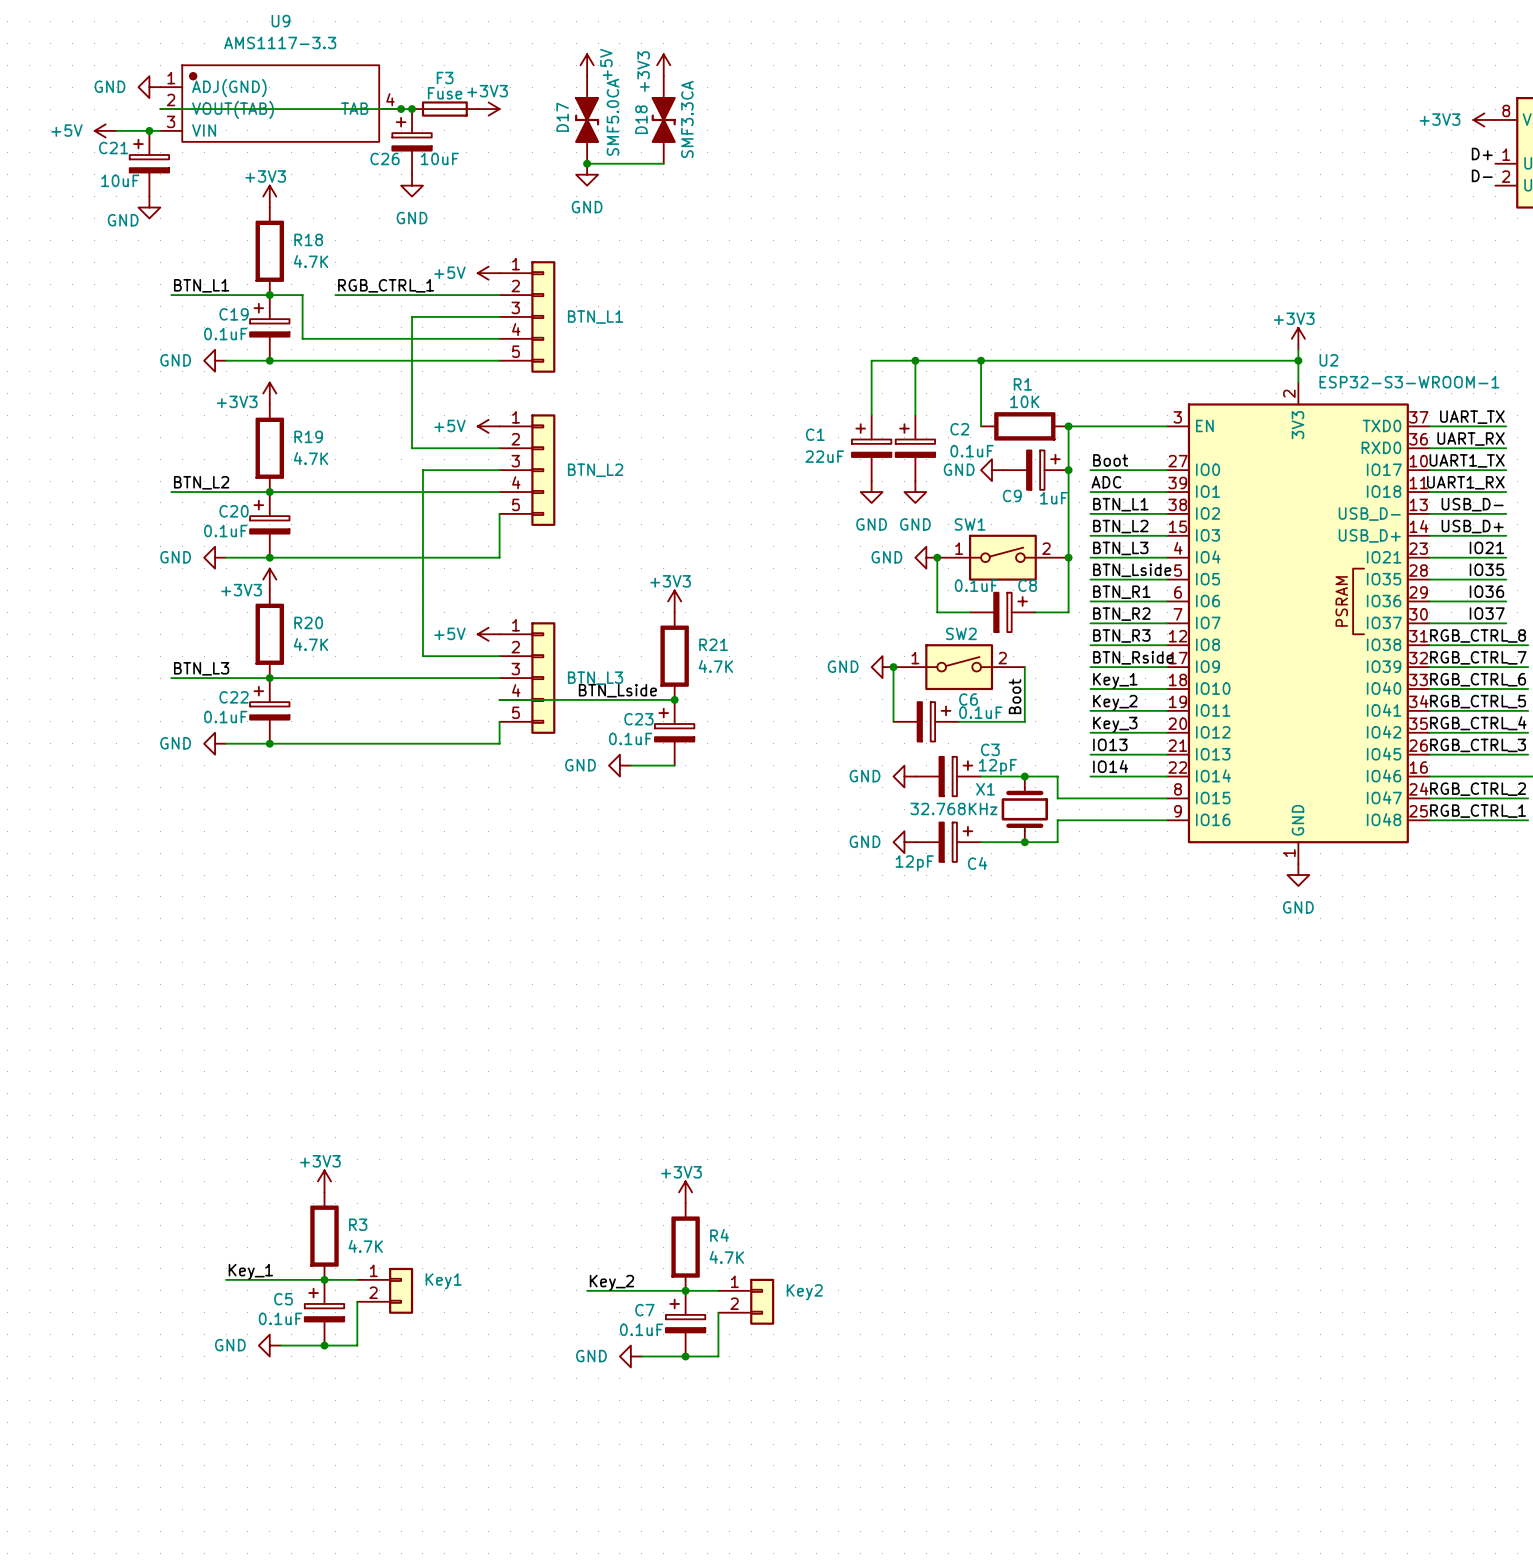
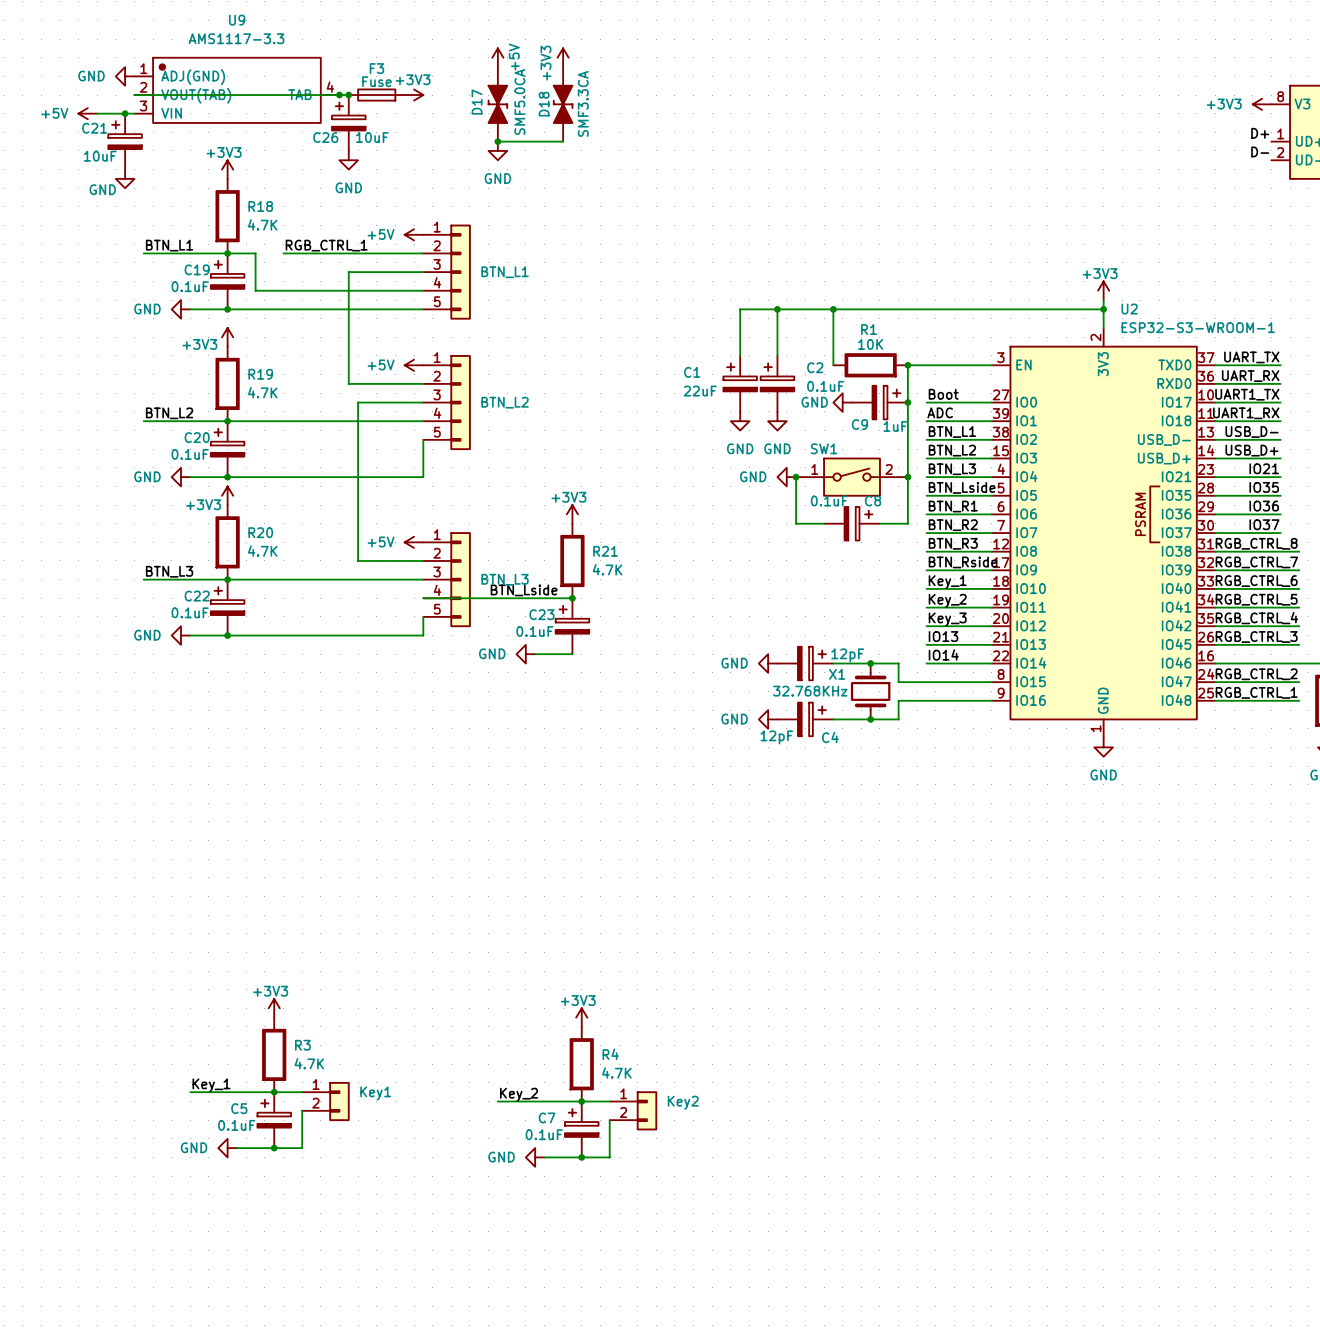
power symbol: GND (882, 667) -> none
wire: (893, 667) (893, 721) -> none
junction: (893, 667) -> none
SW2: (959, 667) -> none
wire: (1024, 667) (1024, 721) (959, 721) -> none
label: Boot (1015, 696) -> none
C6: 0.1uF (926, 721) -> none
C3 name: C3 (990, 749) -> none

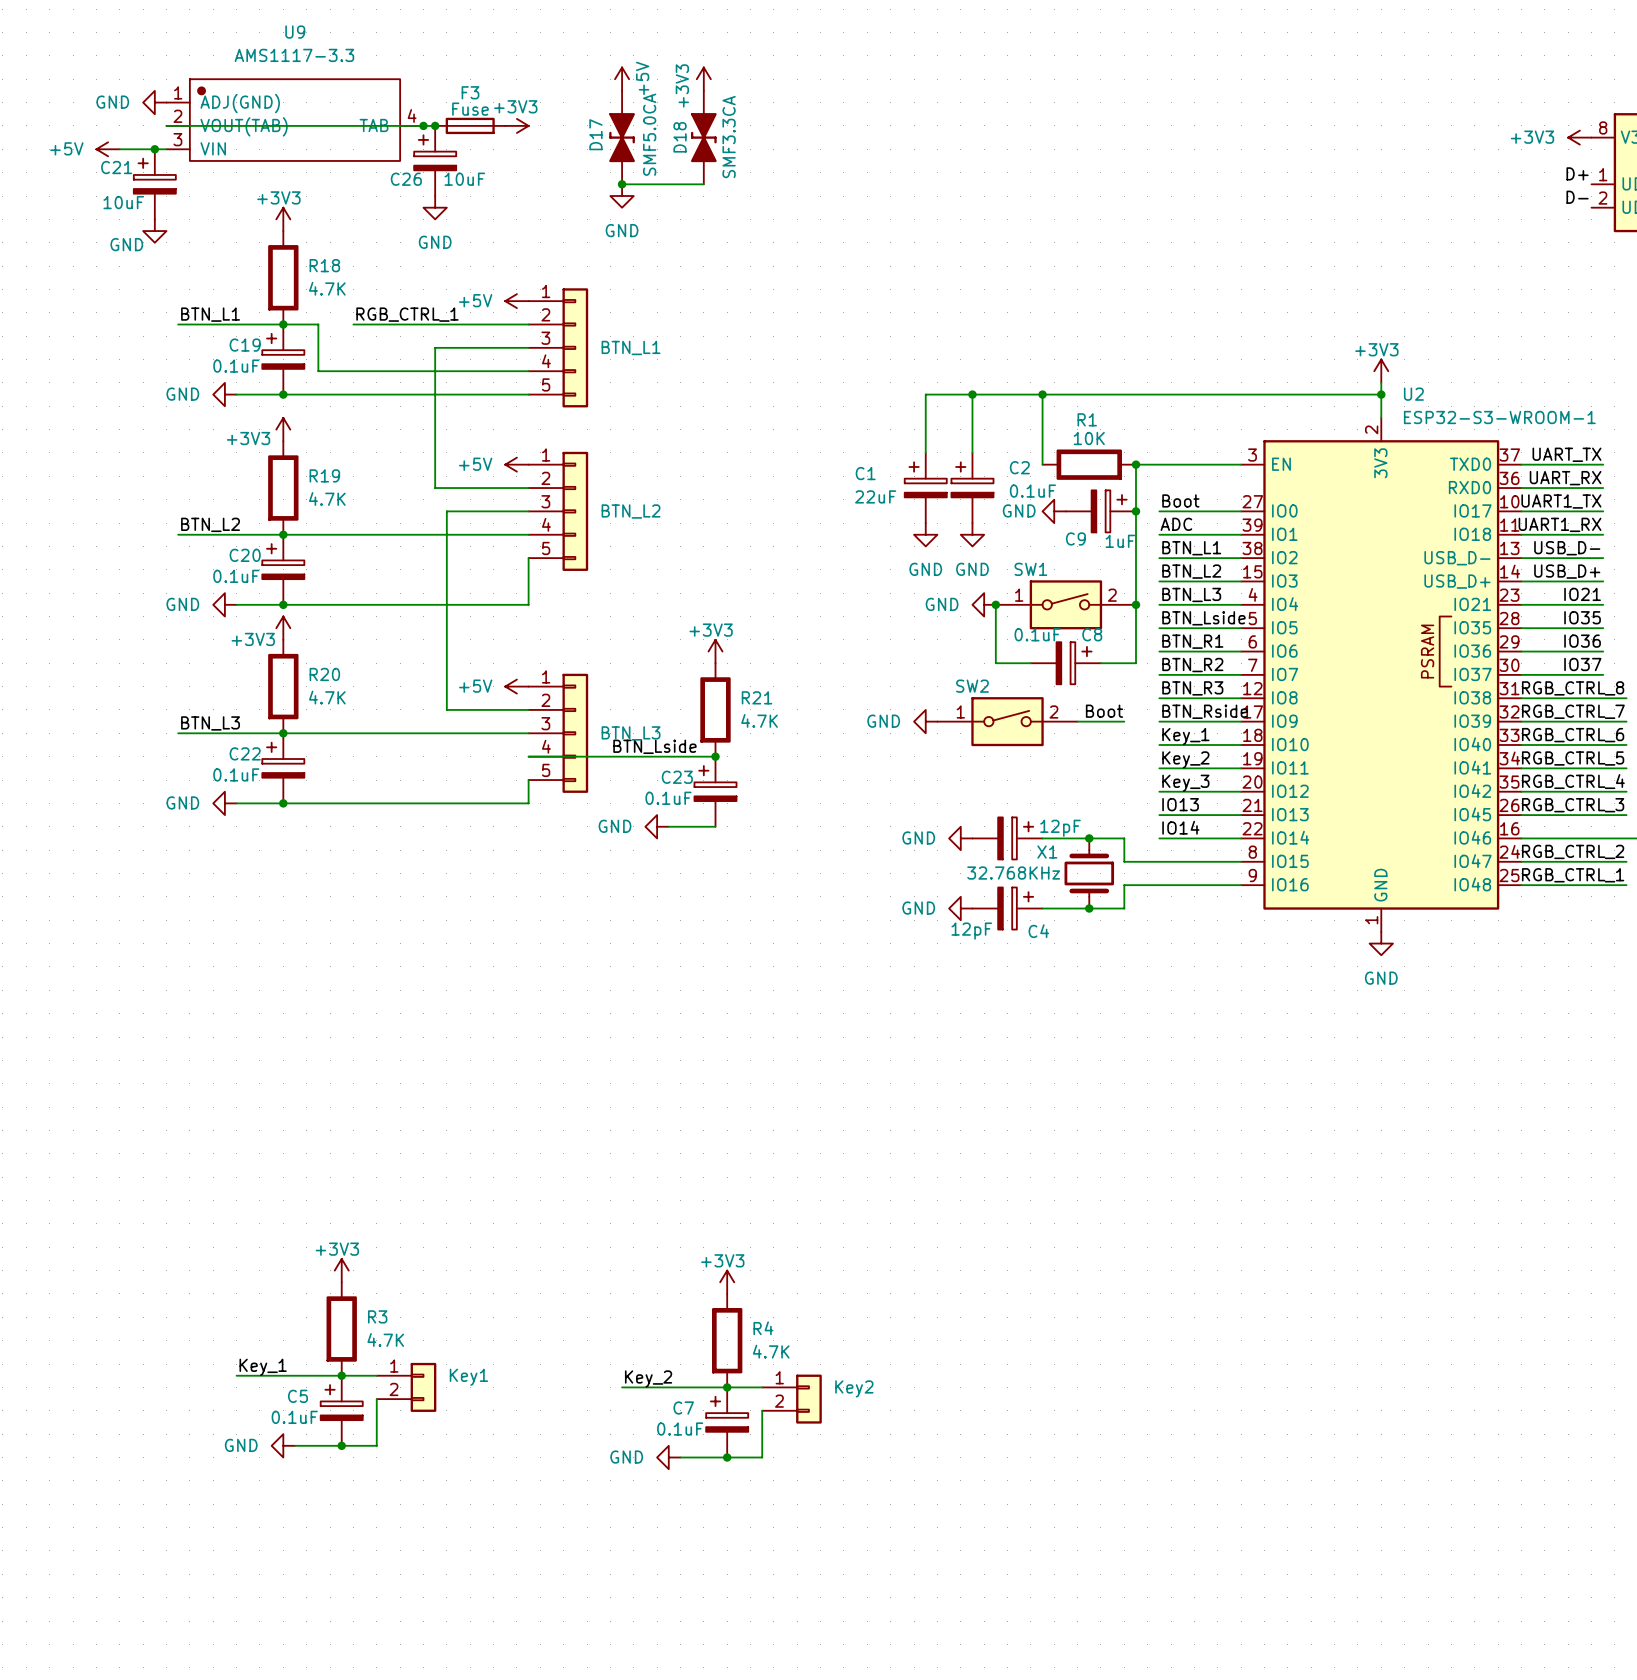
label: none -> Boot (1104, 711)
power symbol: none -> GND (925, 721)
SW2: none -> (1007, 721)
wire: none -> (1077, 721) (1124, 721)

